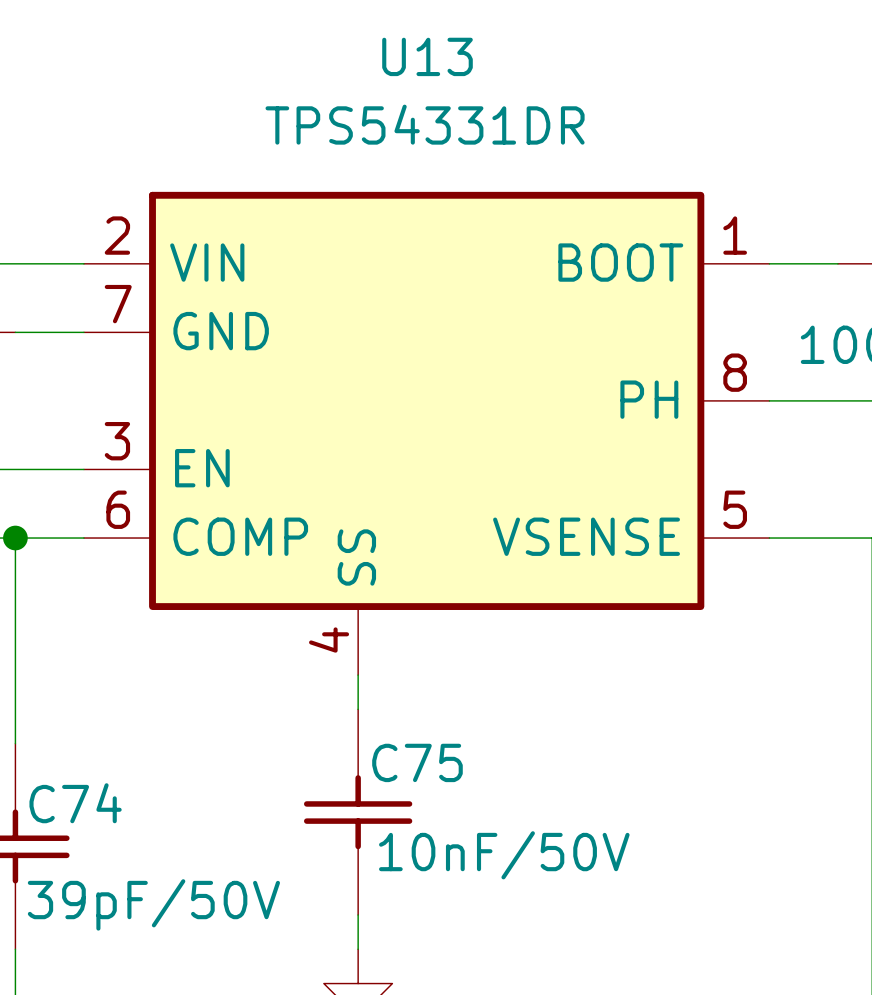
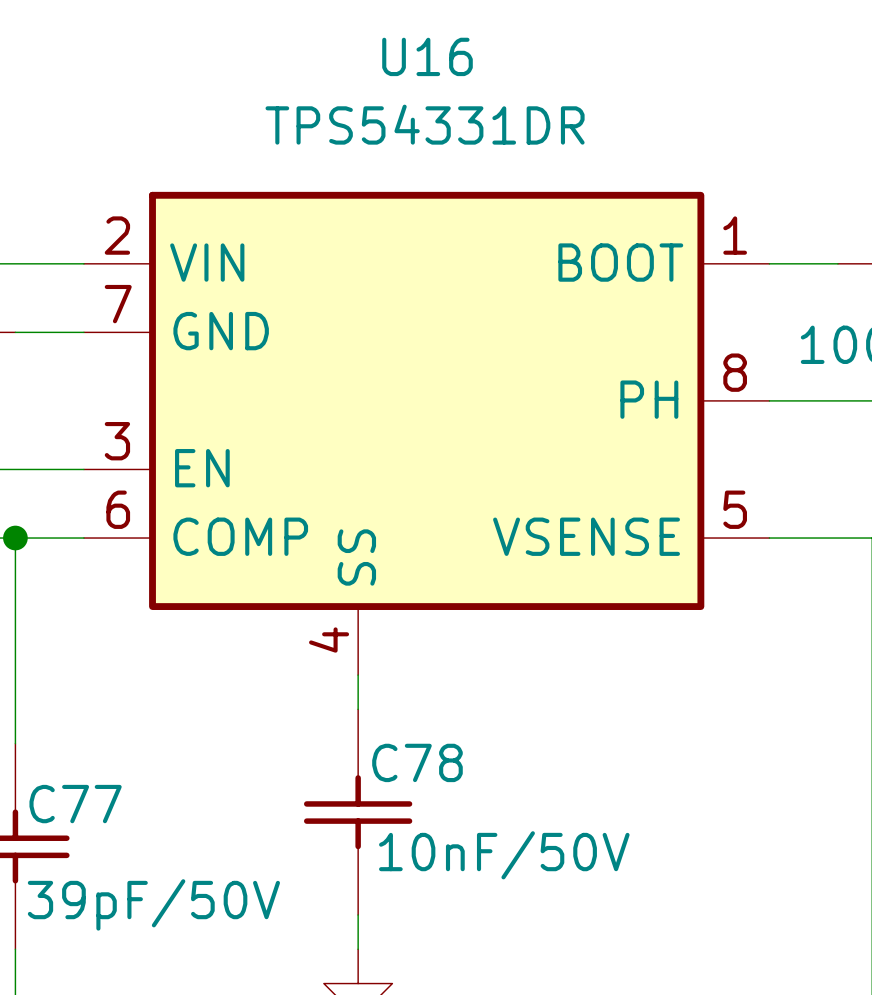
U13 name: U13 (427, 56) -> U16 (427, 56)
C75 name: C75 (417, 762) -> C78 (417, 762)
C74 name: C74 (75, 803) -> C77 (75, 804)

